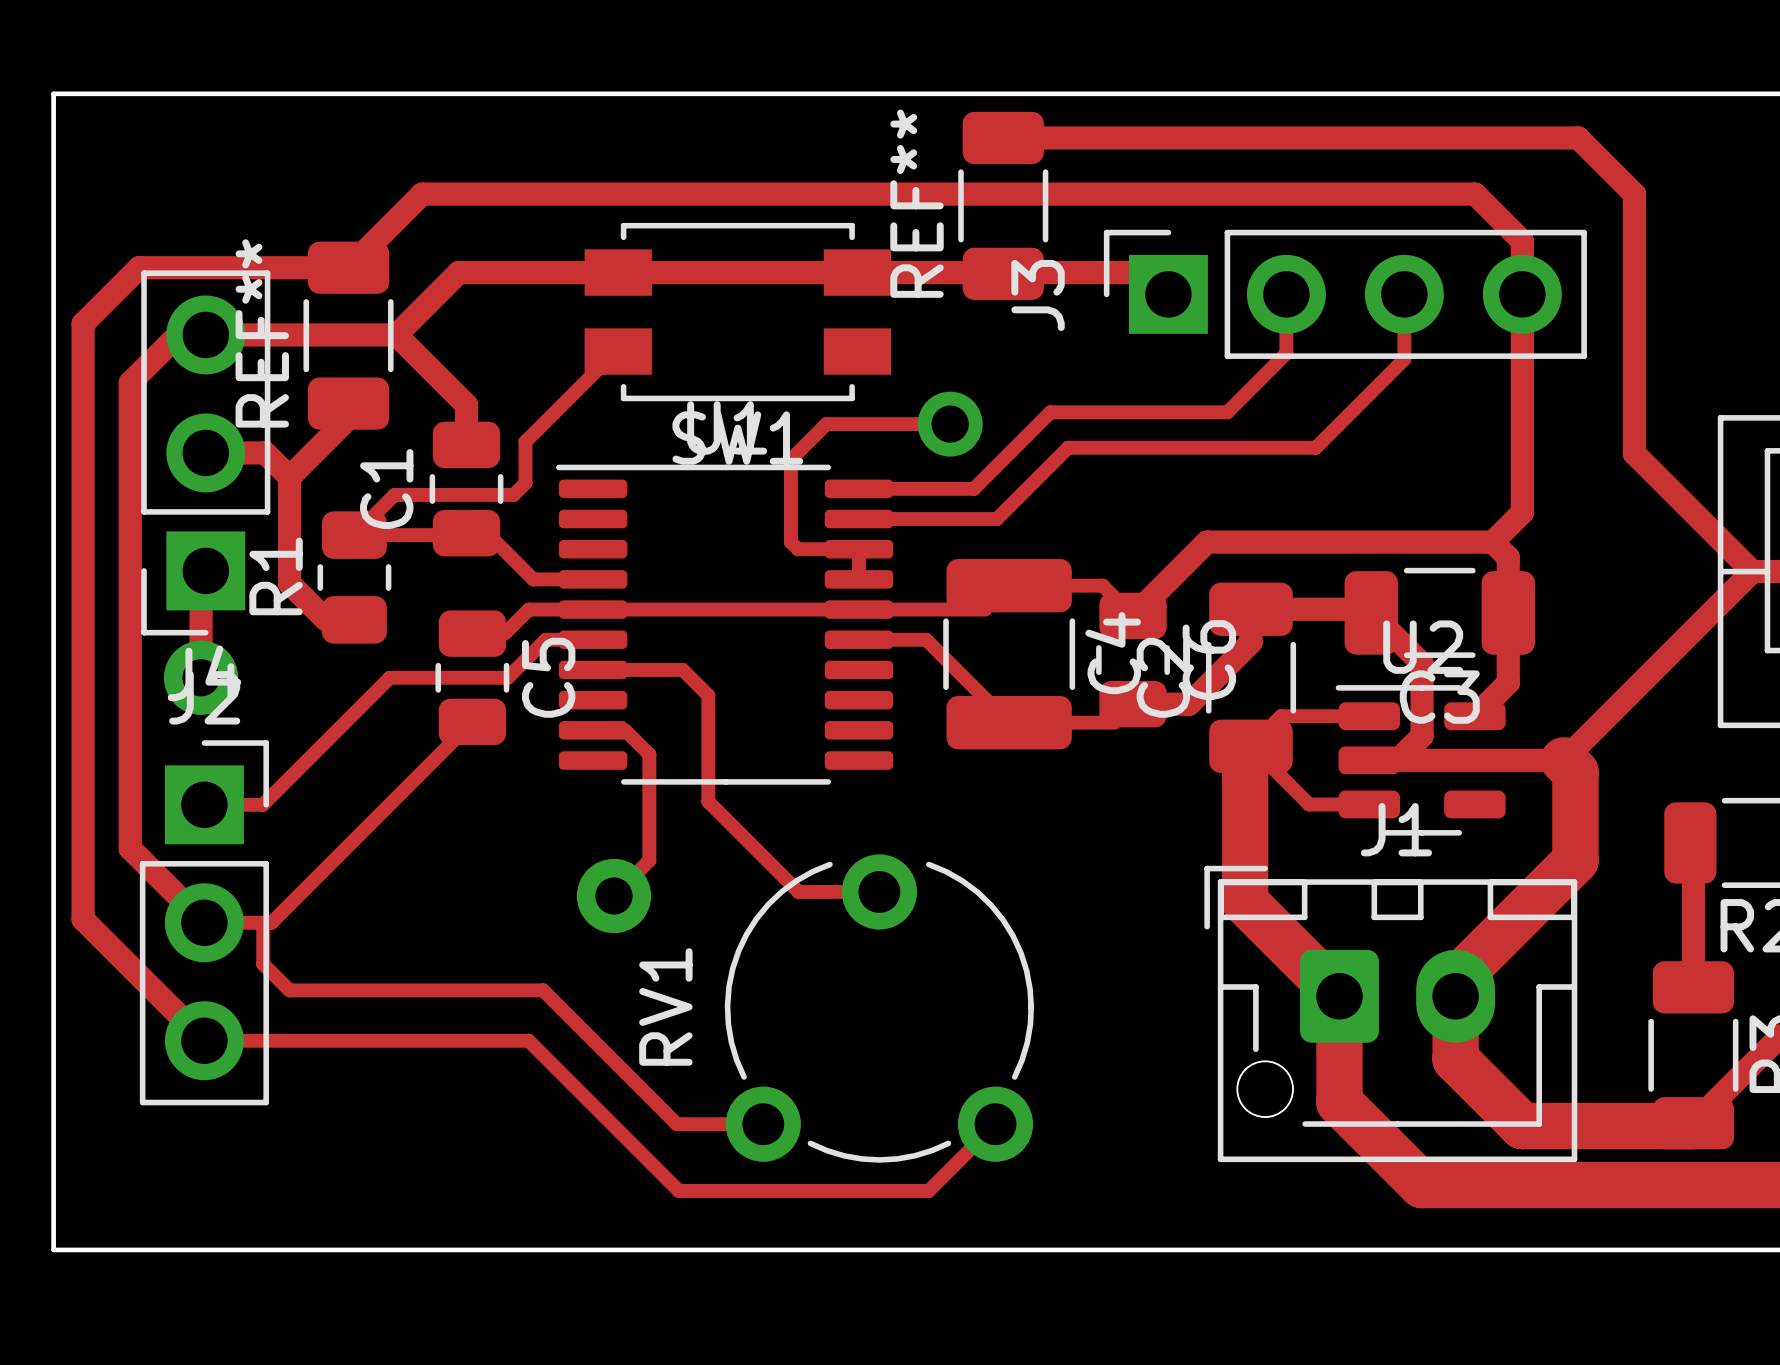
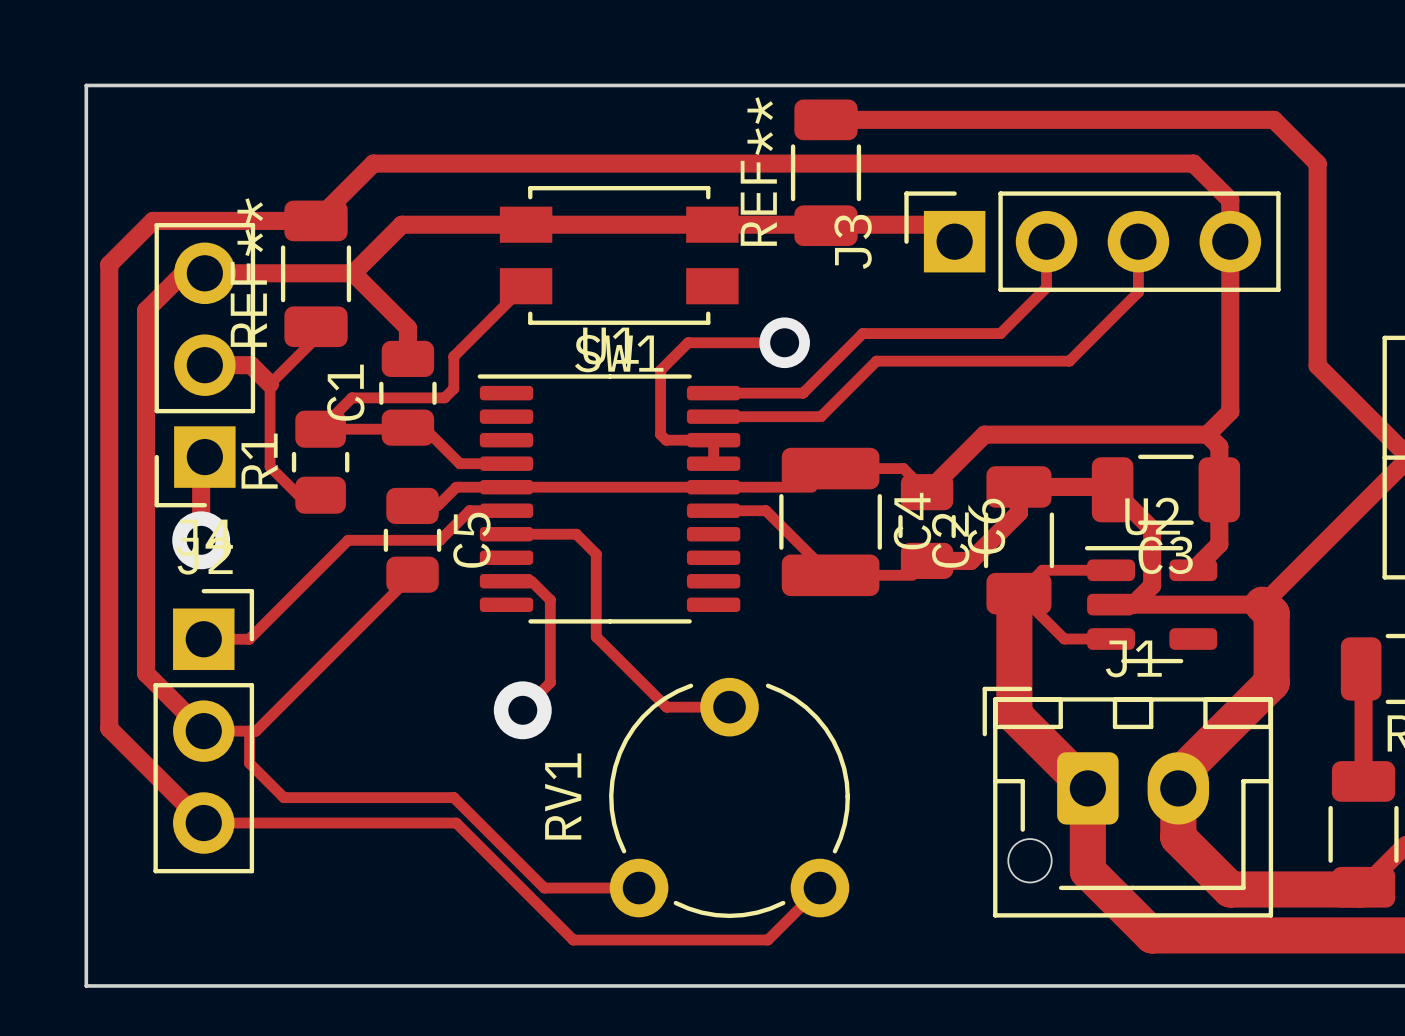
track width: thick (348, 418) (289, 477) (289, 583) (326, 619) -> thin (316, 338) (270, 384) (270, 466) (298, 495)
track: (289, 990) (543, 990) (676, 1124) -> (270, 783) (283, 797) (453, 797) (544, 888) (571, 888)

